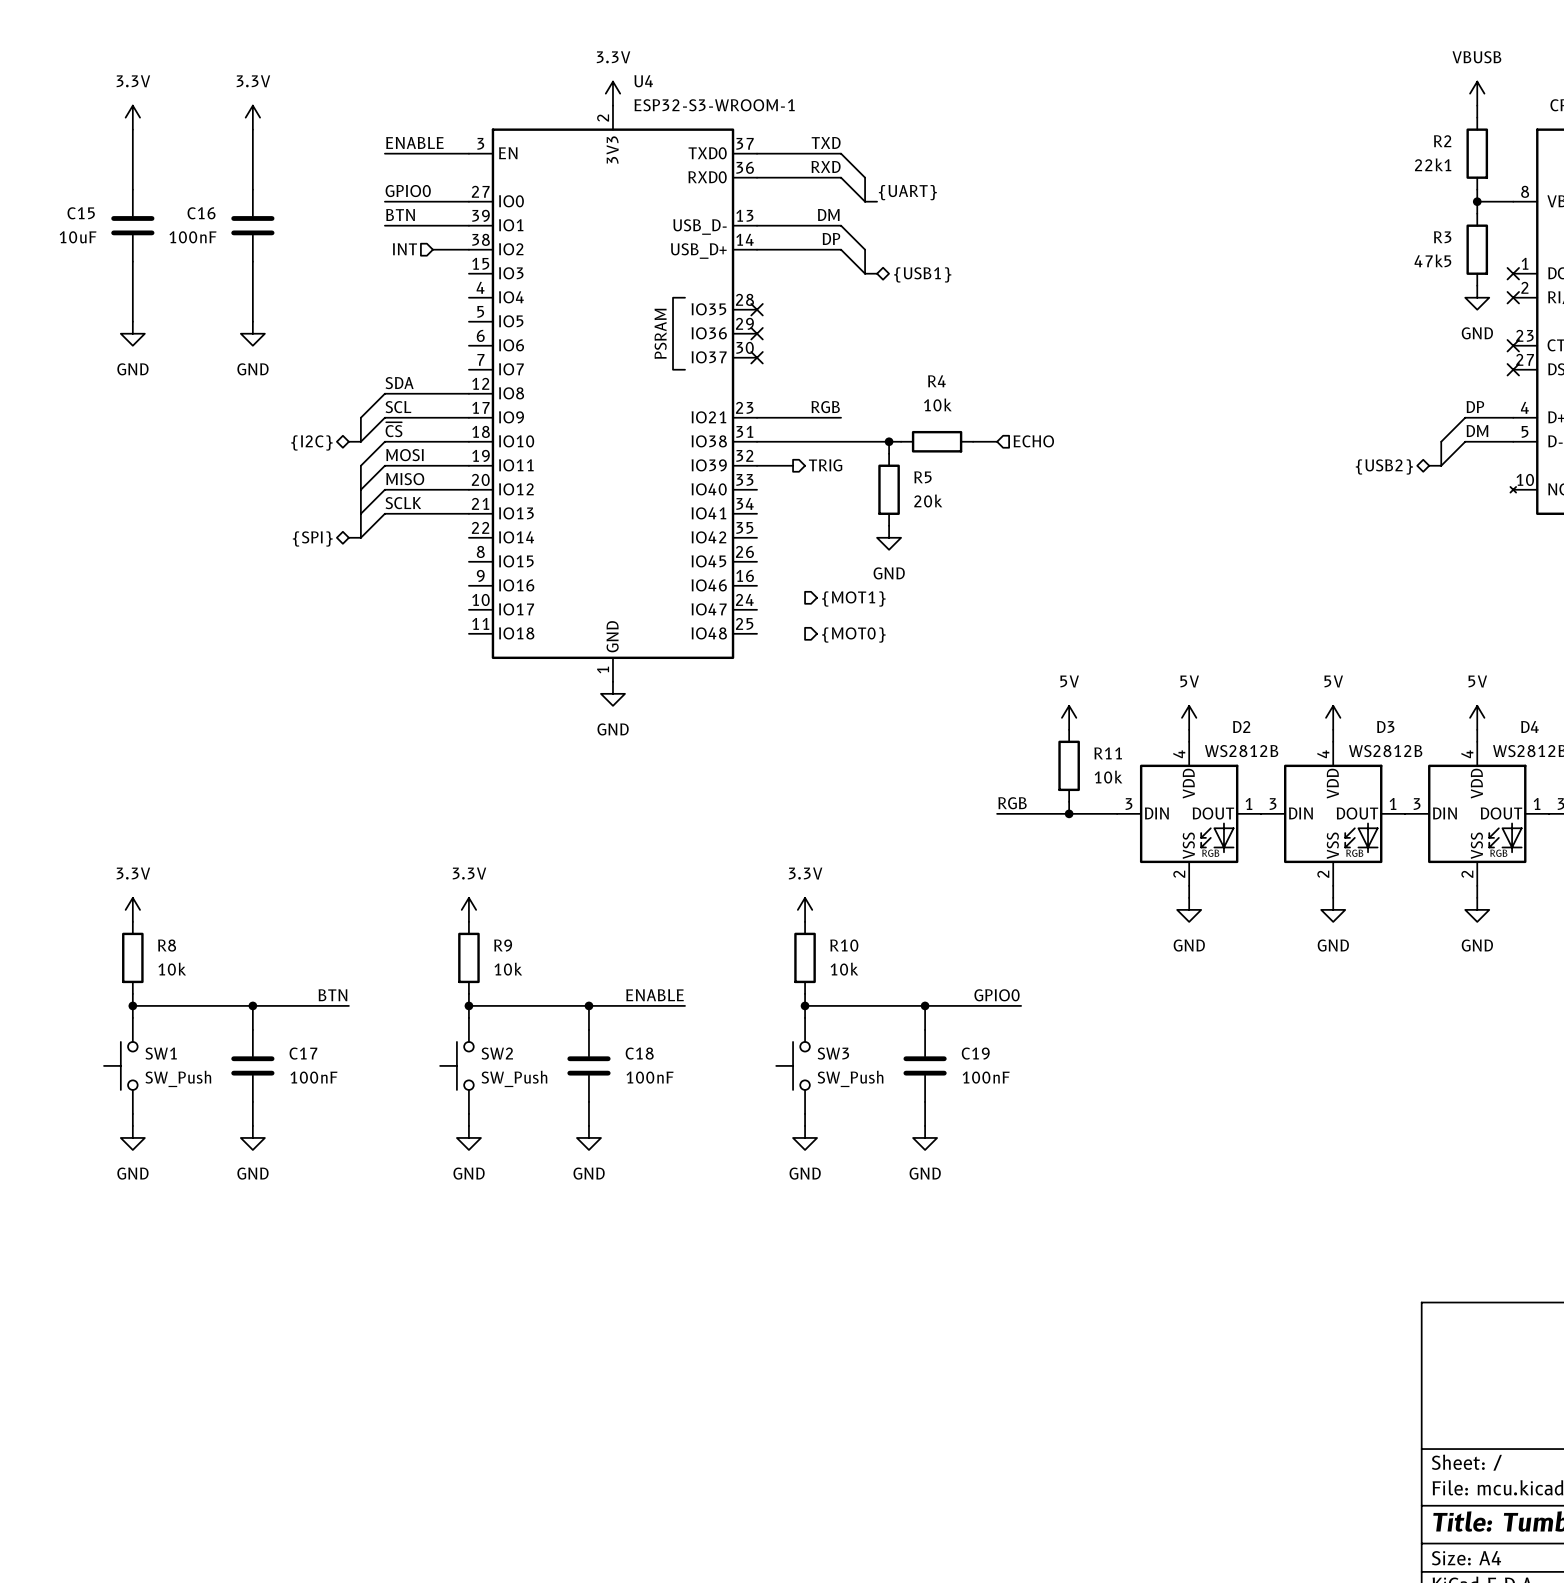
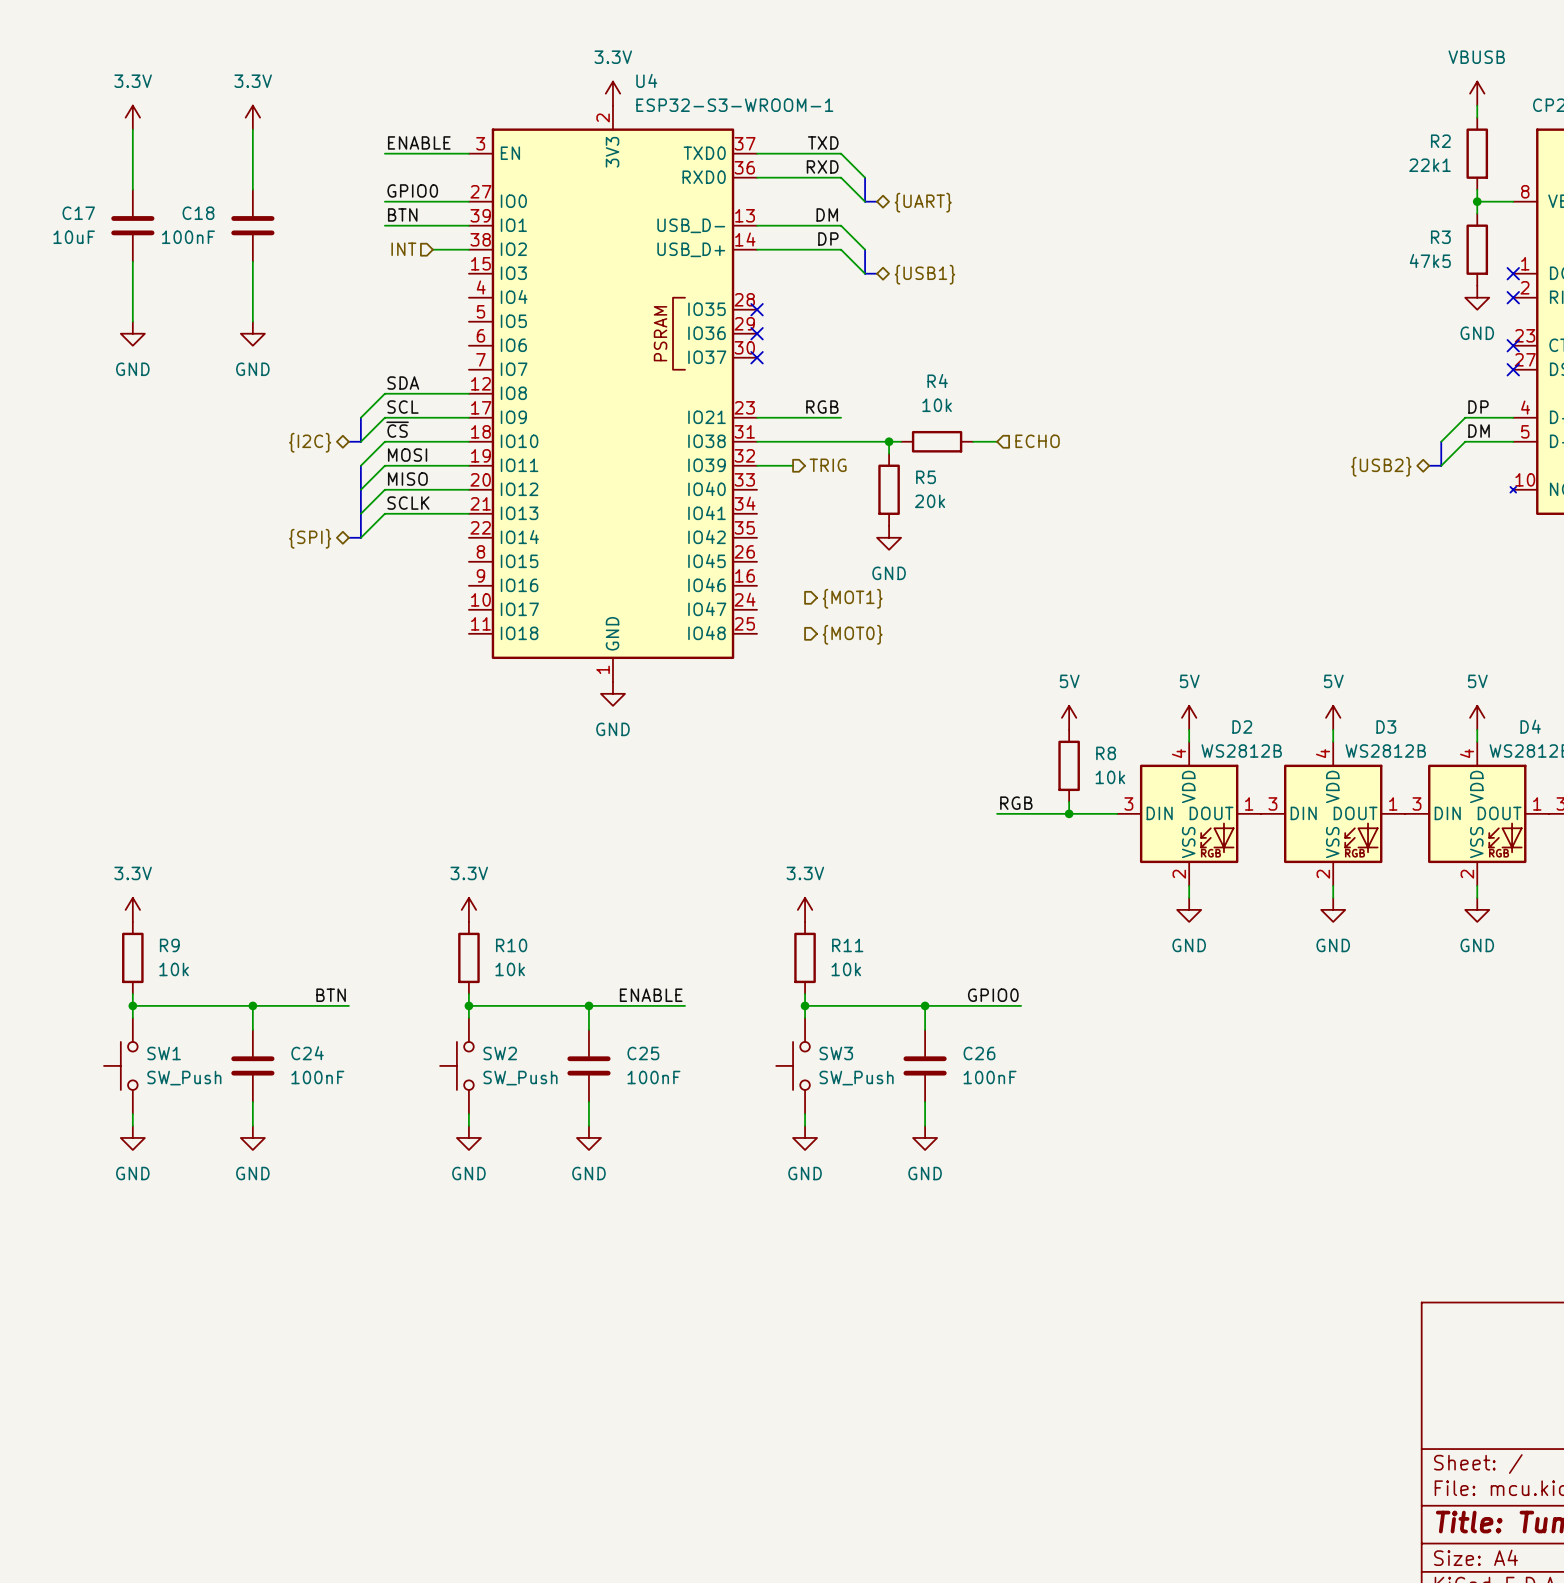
label: {UART} (907, 192) -> none
hierarchical label: none -> {UART} (923, 202)
C15 name: C15 (81, 213) -> C17 (78, 213)
C16 name: C16 (201, 213) -> C18 (198, 213)
R11 name: R11 (1108, 753) -> R8 (1106, 753)
R8 name: R8 (167, 945) -> R9 (169, 945)
R9 name: R9 (503, 945) -> R10 (511, 945)
R10 name: R10 (844, 945) -> R11 (847, 945)
C17 name: C17 (303, 1053) -> C24 (307, 1053)
C18 name: C18 (639, 1053) -> C25 (643, 1053)
C19 name: C19 (975, 1053) -> C26 (979, 1053)

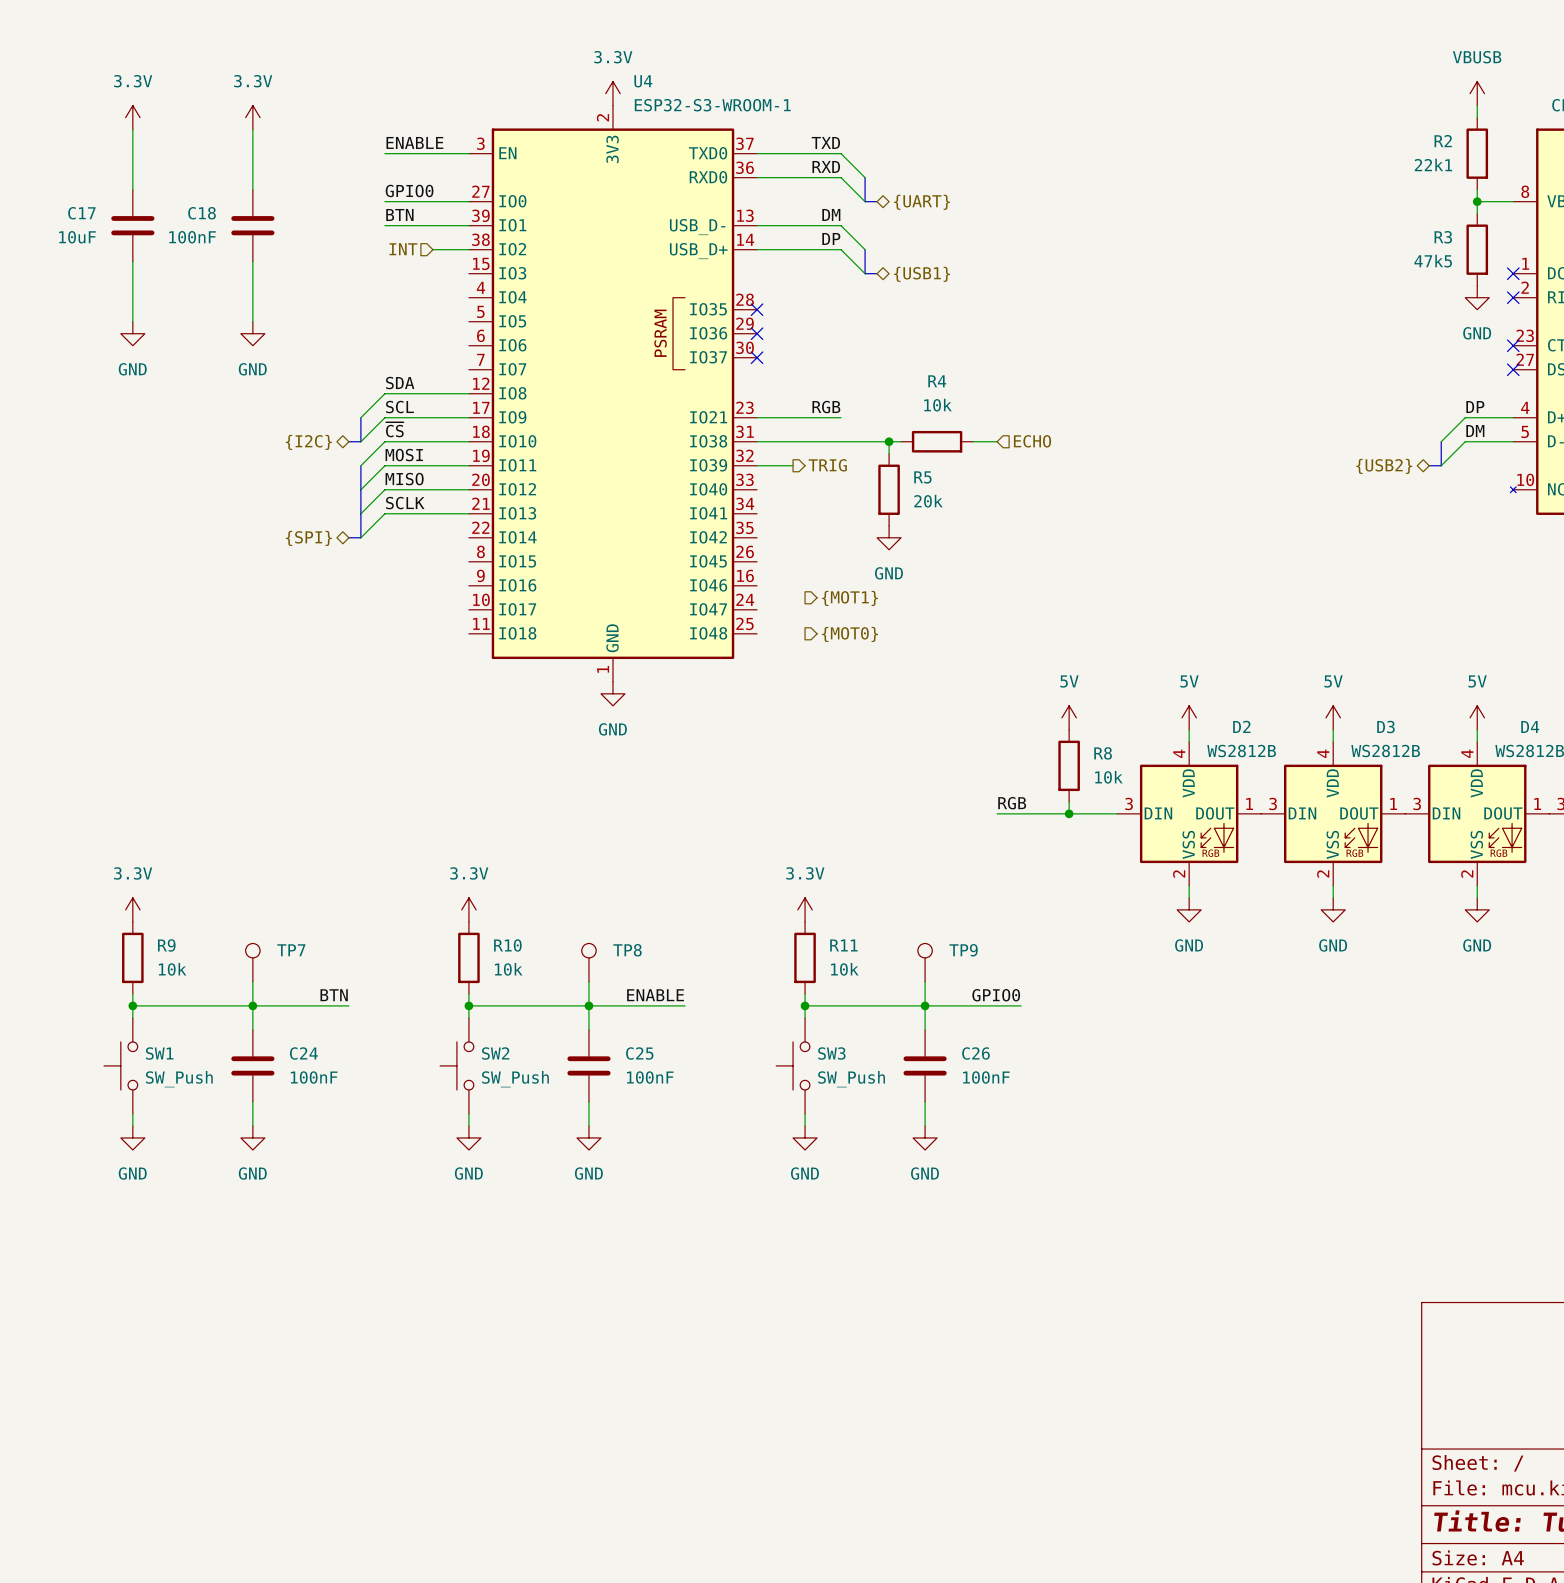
TP7: none -> (252, 962)
TP8: none -> (588, 962)
TP9: none -> (925, 962)
wire: none -> (252, 981) (252, 1005)
wire: none -> (588, 981) (588, 1005)
wire: none -> (925, 981) (925, 1005)

